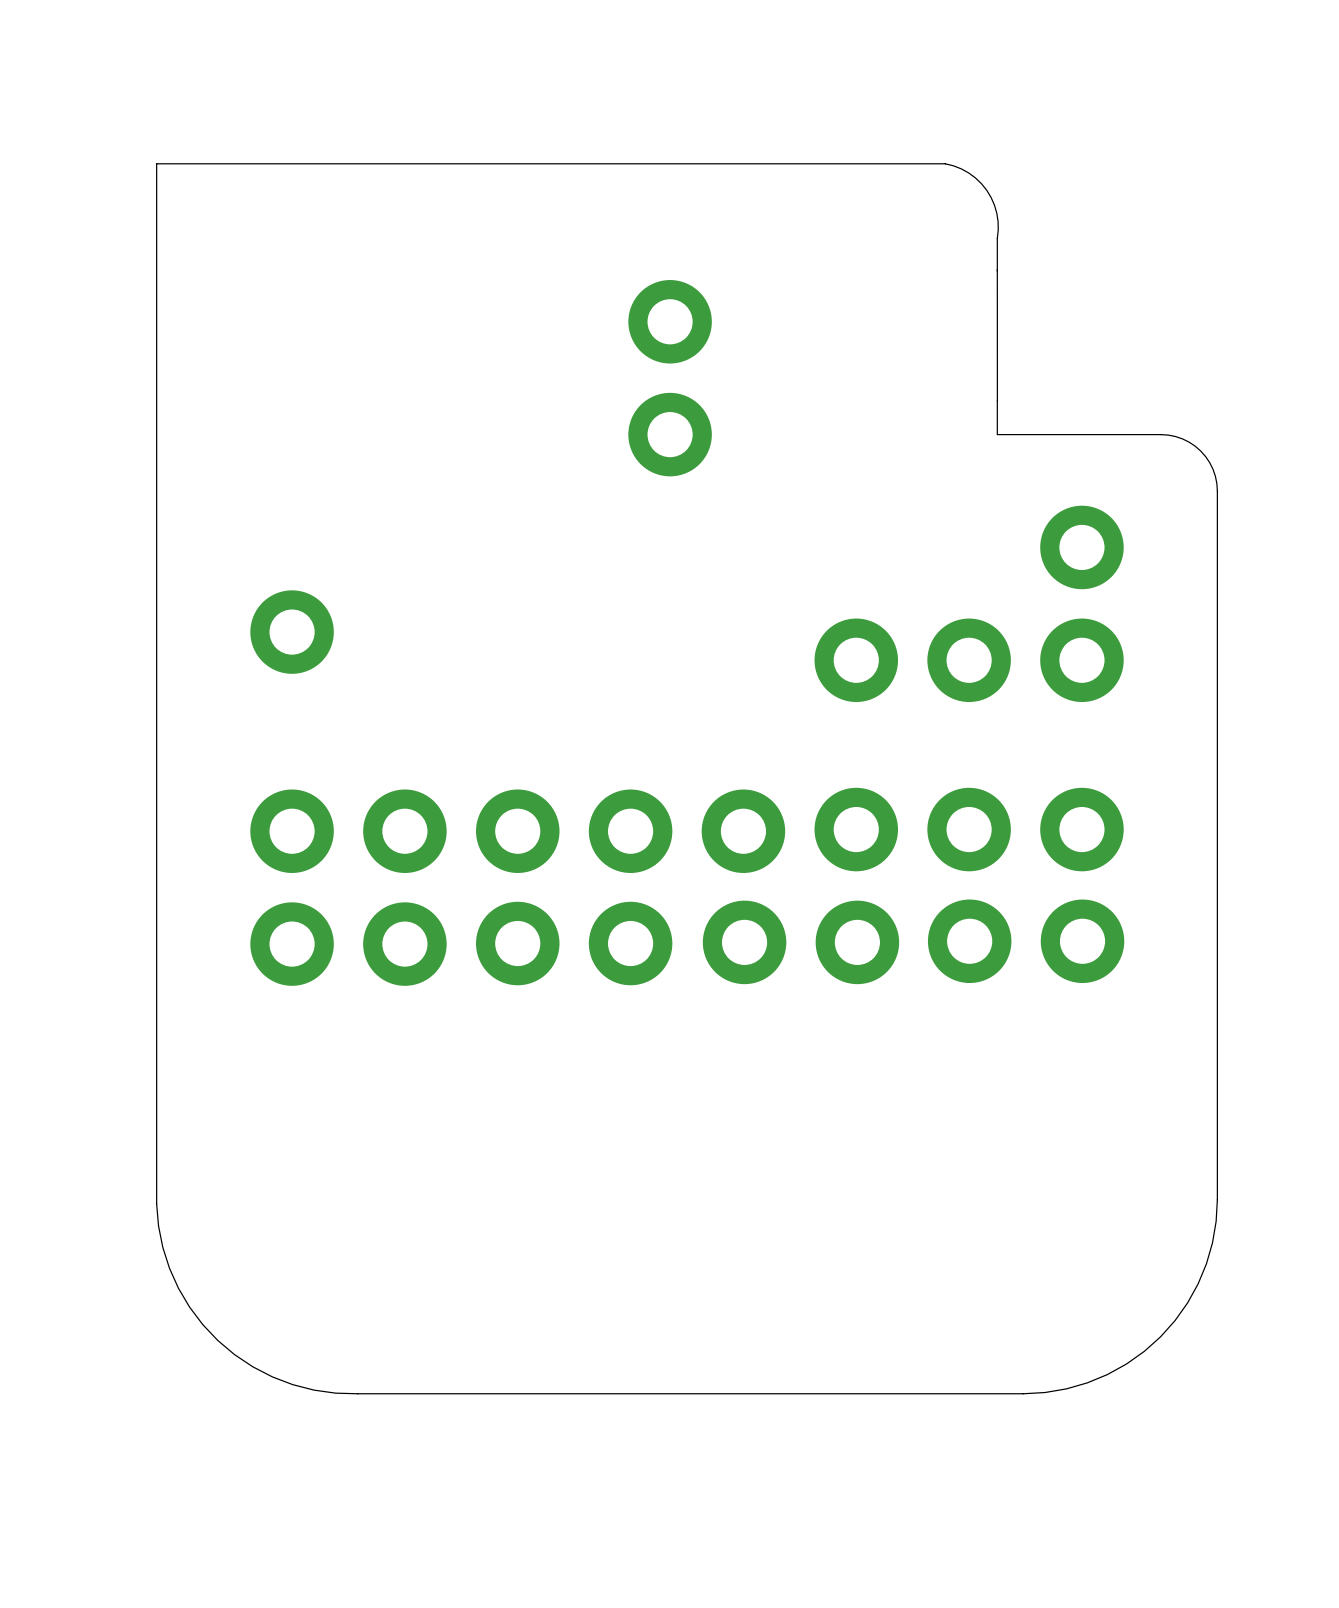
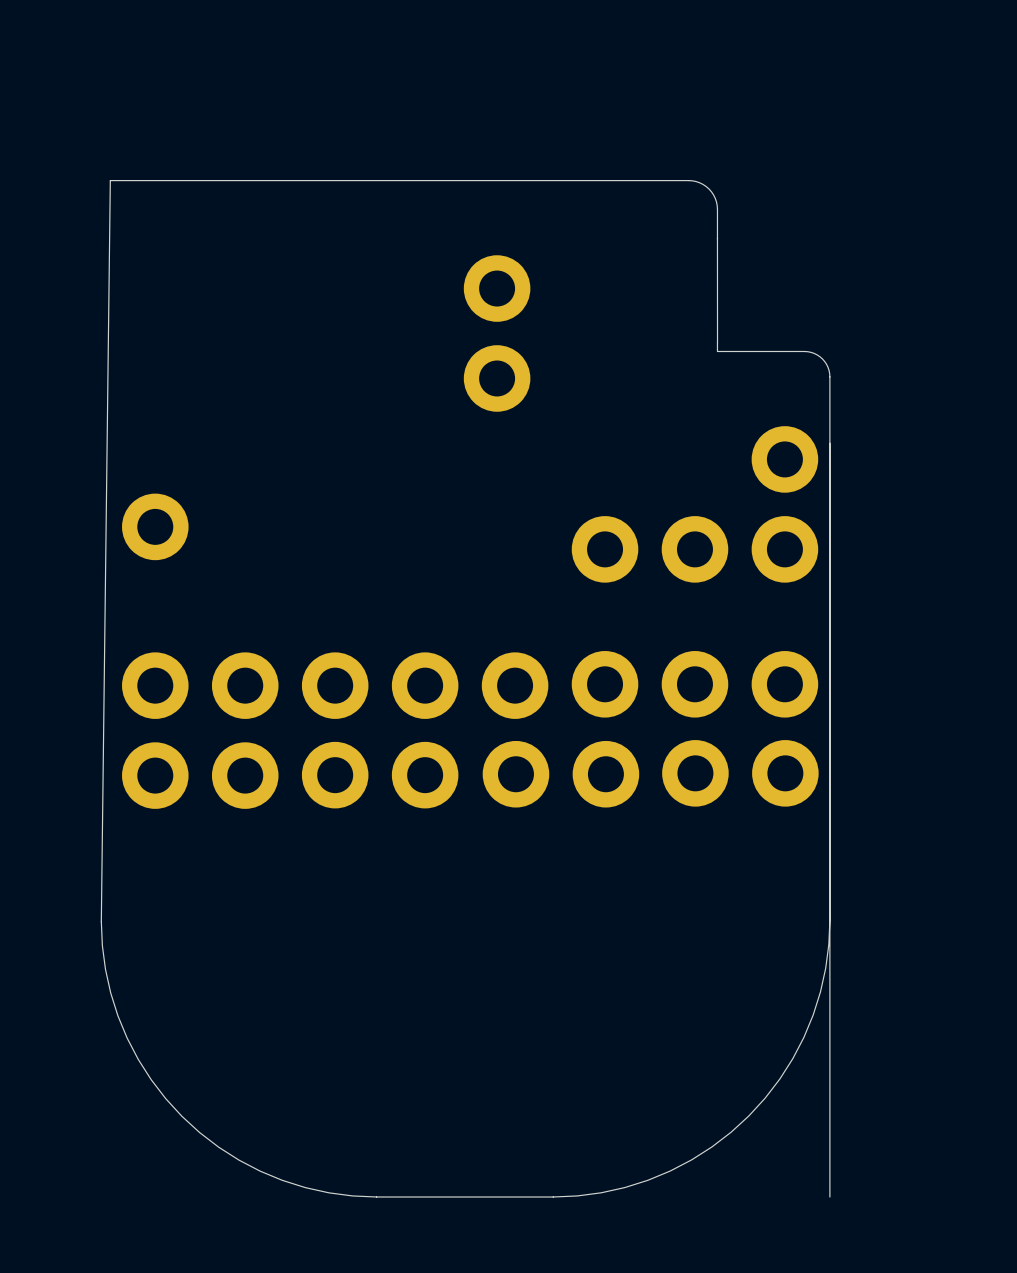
board edge: (997, 238) (996, 213) (986, 190) (968, 172) (945, 163) (156, 163) (156, 1204) (162, 1247) (178, 1288) (202, 1324) (234, 1354) (272, 1376) (292, 1384) (335, 1393) (1023, 1393) (1066, 1388) (1107, 1374) (1144, 1351) (1175, 1320) (1187, 1302) (1206, 1263) (1216, 1221) (1217, 1199) (1216, 483) (1213, 469) (1205, 456) (1189, 442) (1175, 436) (1160, 434) (997, 434) (997, 412) -> (717, 213) (715, 198) (709, 189) (699, 182) (688, 180) (110, 180) (101, 921) (105, 969) (110, 992) (127, 1038) (138, 1059) (165, 1098) (199, 1132) (238, 1160) (260, 1171) (305, 1187) (352, 1195) (577, 1195) (624, 1187) (670, 1171) (711, 1146) (731, 1132) (765, 1098) (792, 1058) (813, 1014) (825, 968) (829, 920)
part position: (670, 378) -> (497, 333)
board edge: none -> (717, 351) (807, 351) (822, 358) (829, 373) (829, 1197)

